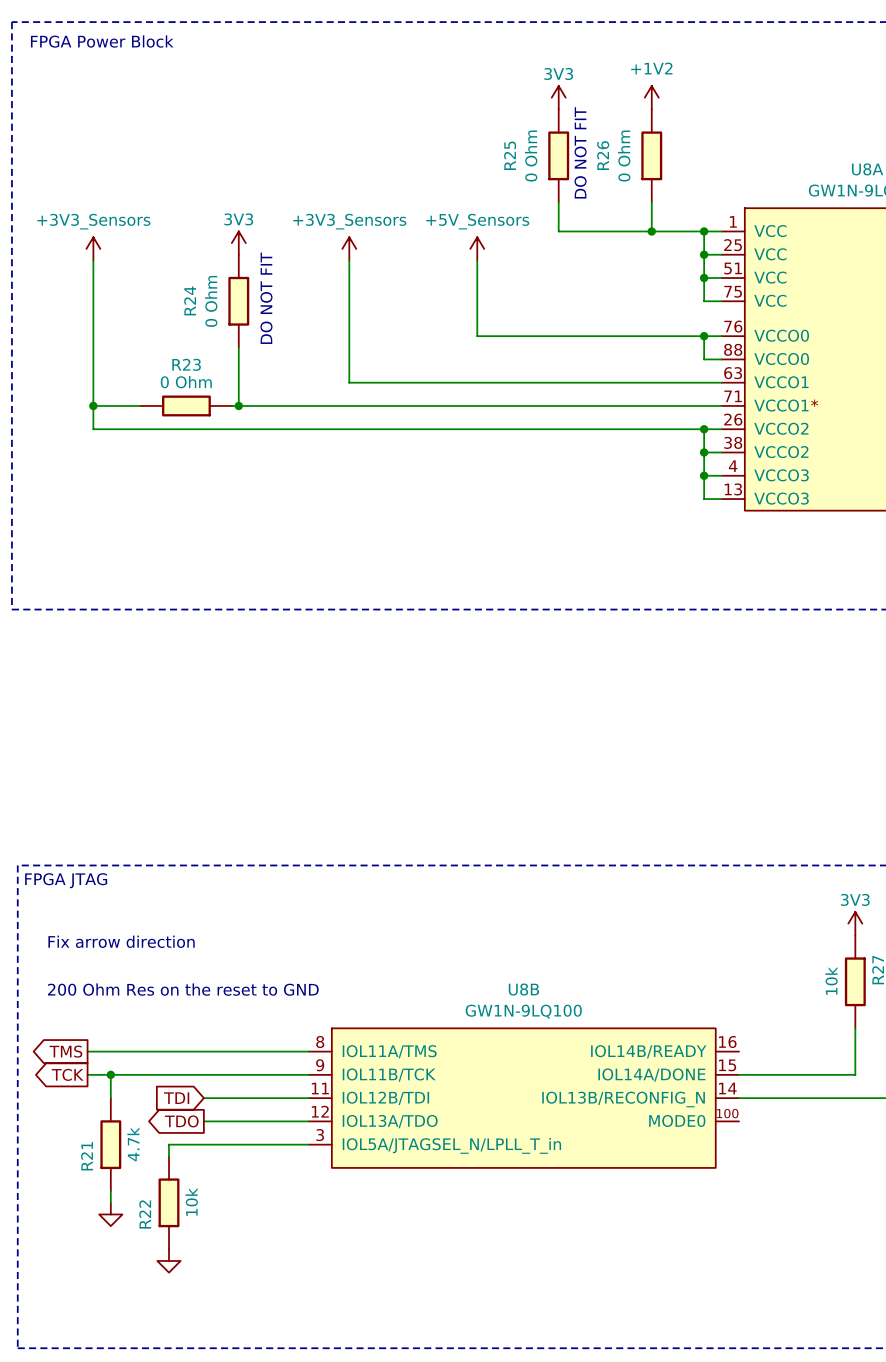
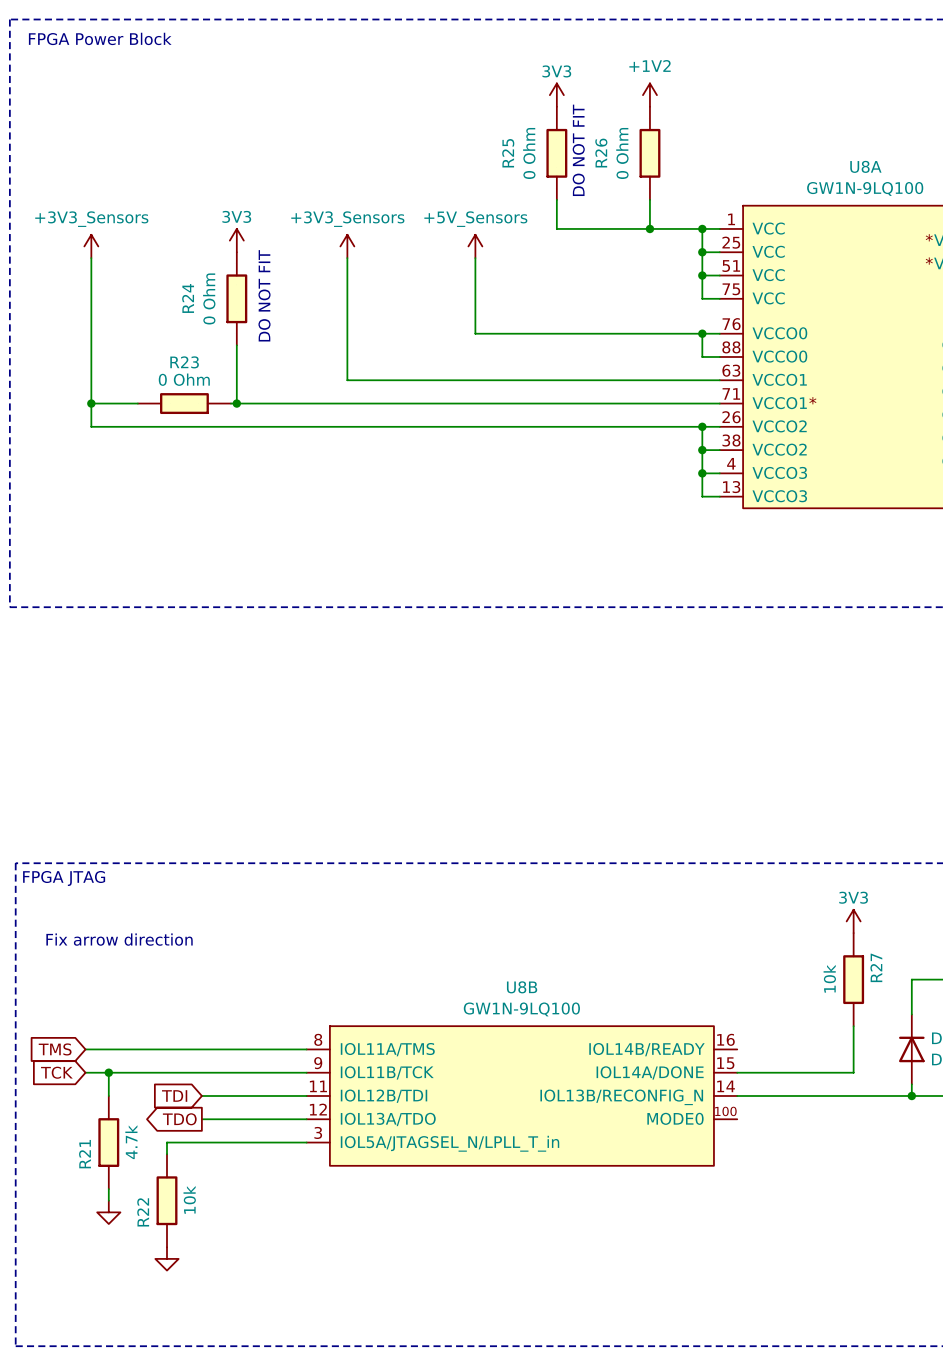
text: 200 Ohm Res on the reset to GND (183, 989) -> none
global label shape: output (65, 1051) -> input (55, 1049)
global label shape: output (67, 1074) -> input (56, 1072)

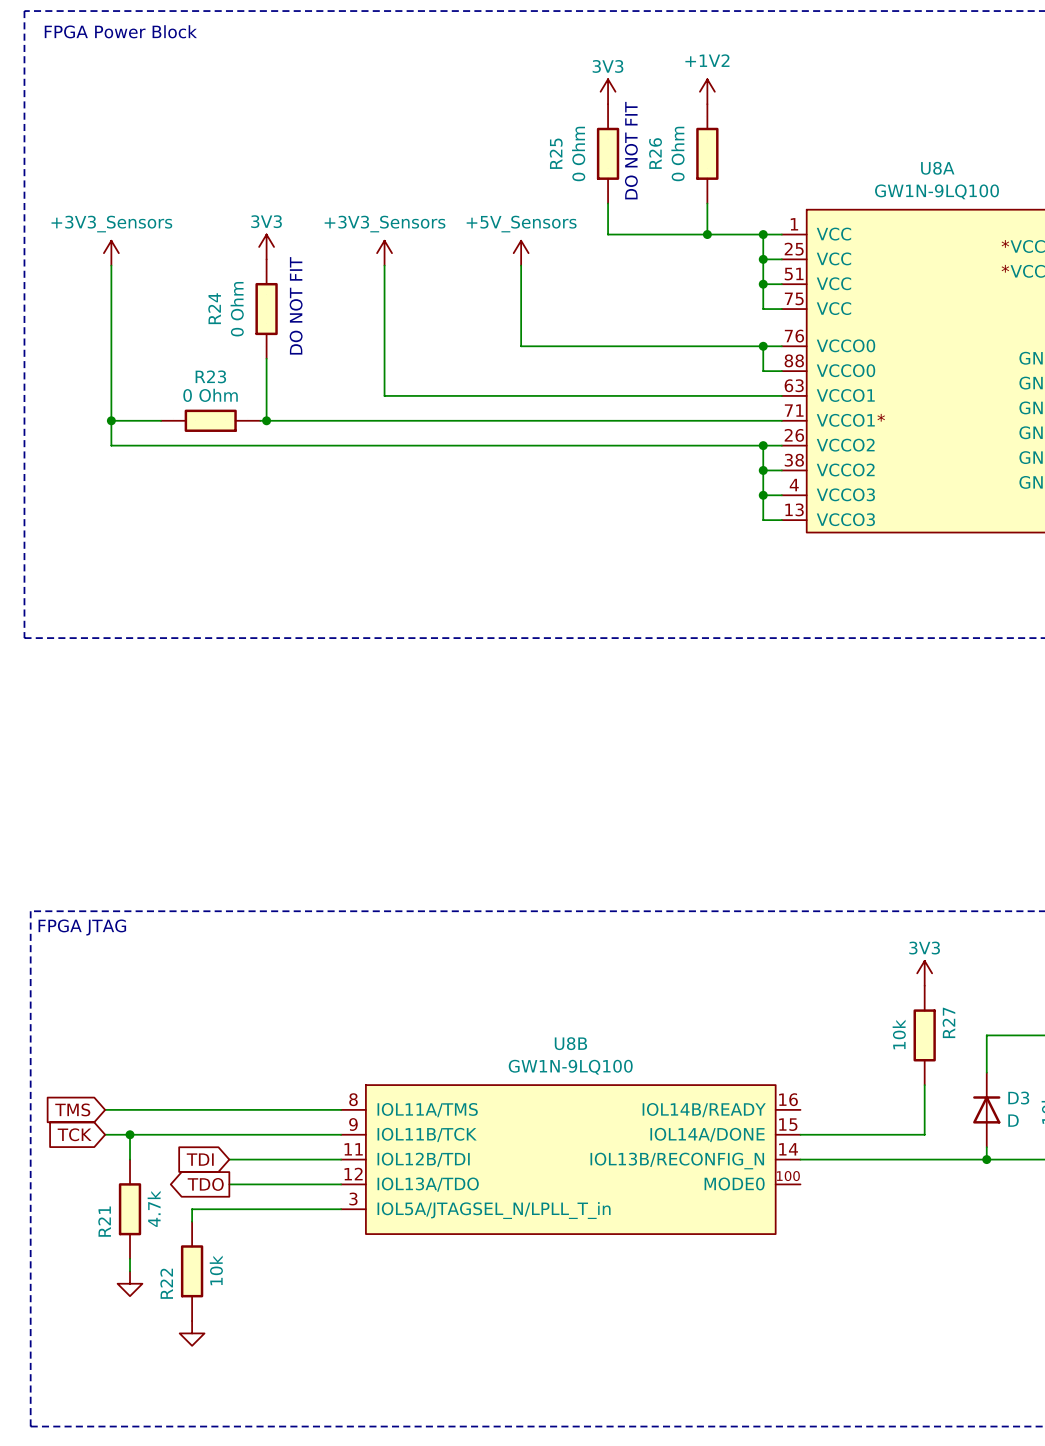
text: Fix arrow direction (119, 939) -> none

